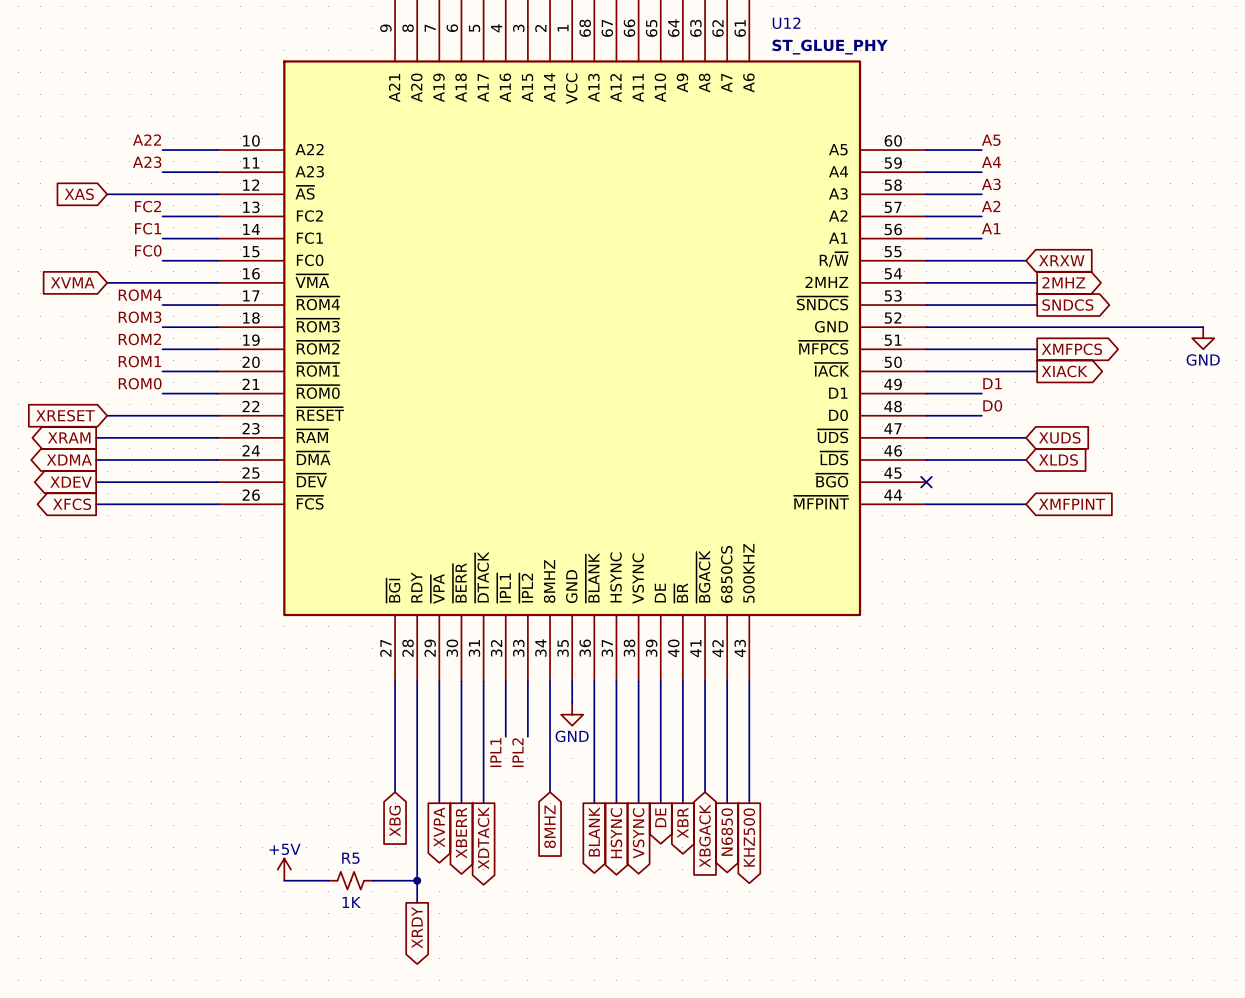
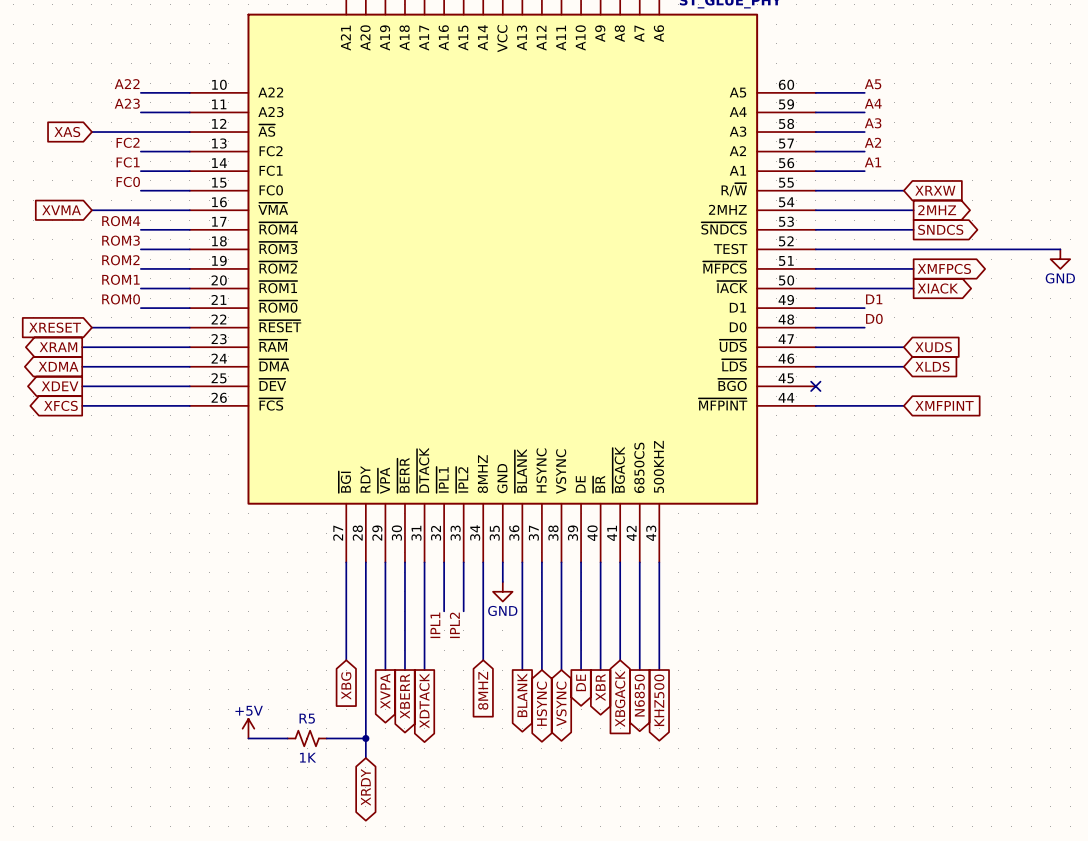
U12 pin name: GND (831, 326) -> TEST (730, 249)
global label shape: output (616, 833) -> bidirectional (541, 703)
global label shape: output (638, 833) -> bidirectional (561, 703)
global label shape: output (417, 927) -> bidirectional (365, 787)

